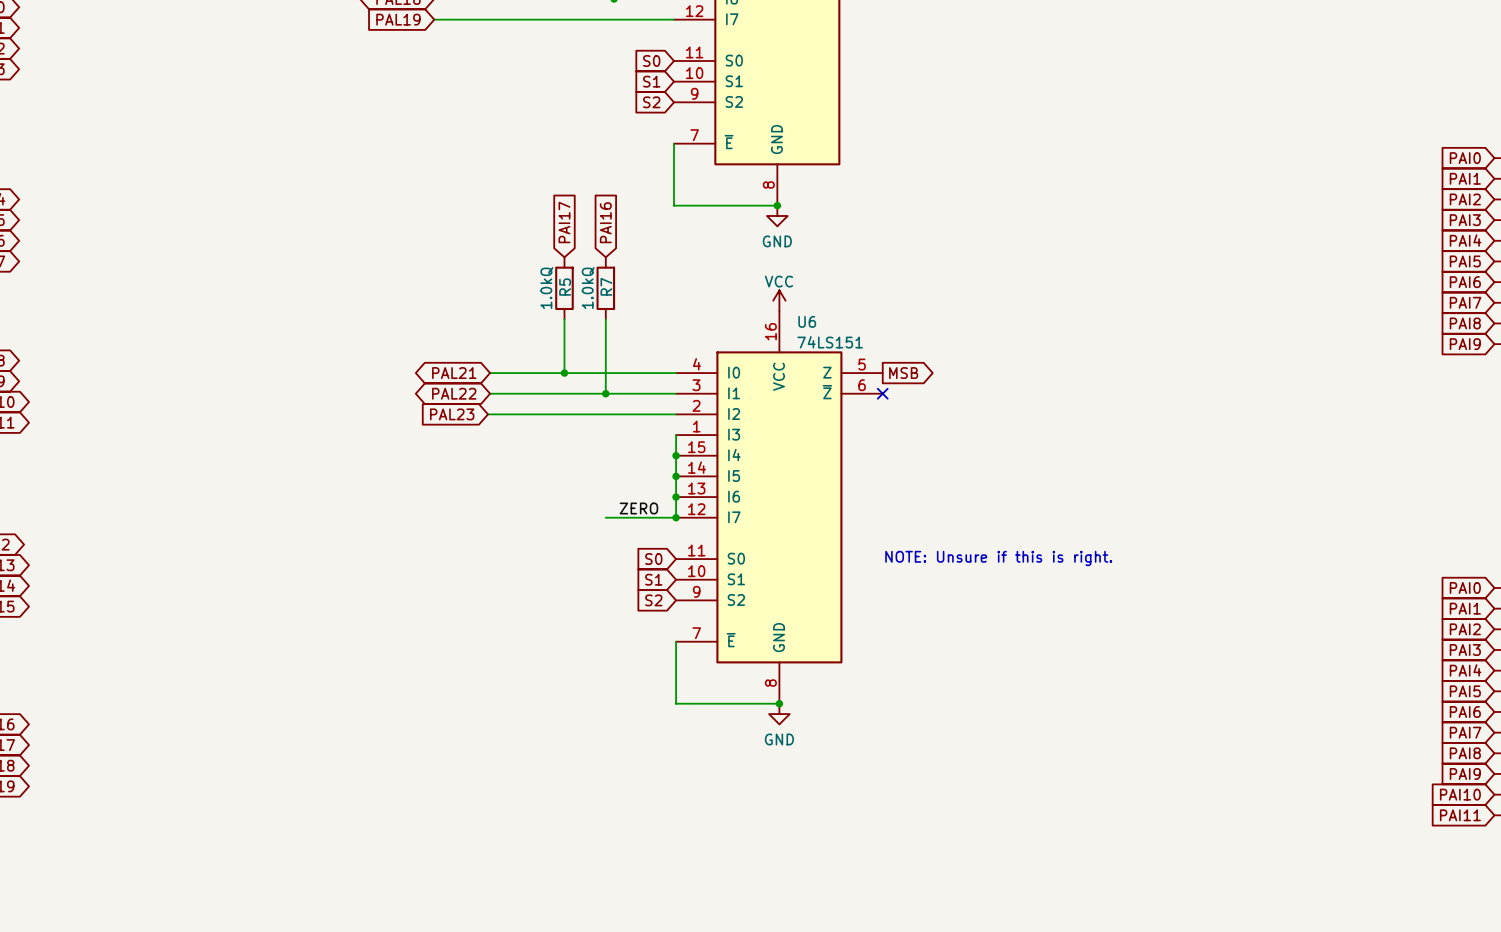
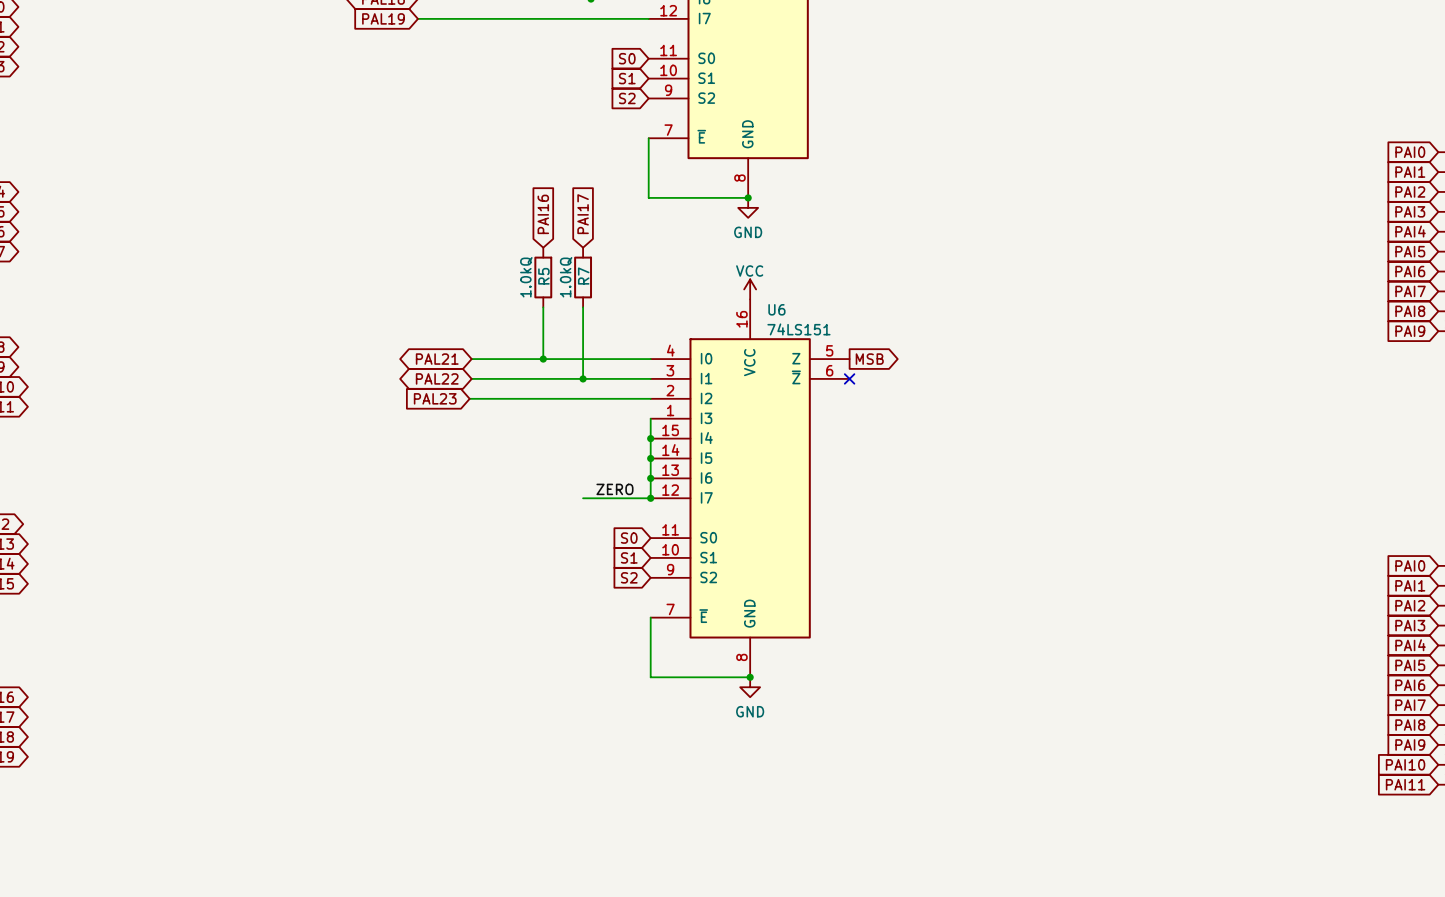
global label: PAI17 (564, 222) -> PAI16 (543, 214)
global label: PAI16 (605, 222) -> PAI17 (583, 214)
text: NOTE: Unsure if this is right. (998, 558) -> none

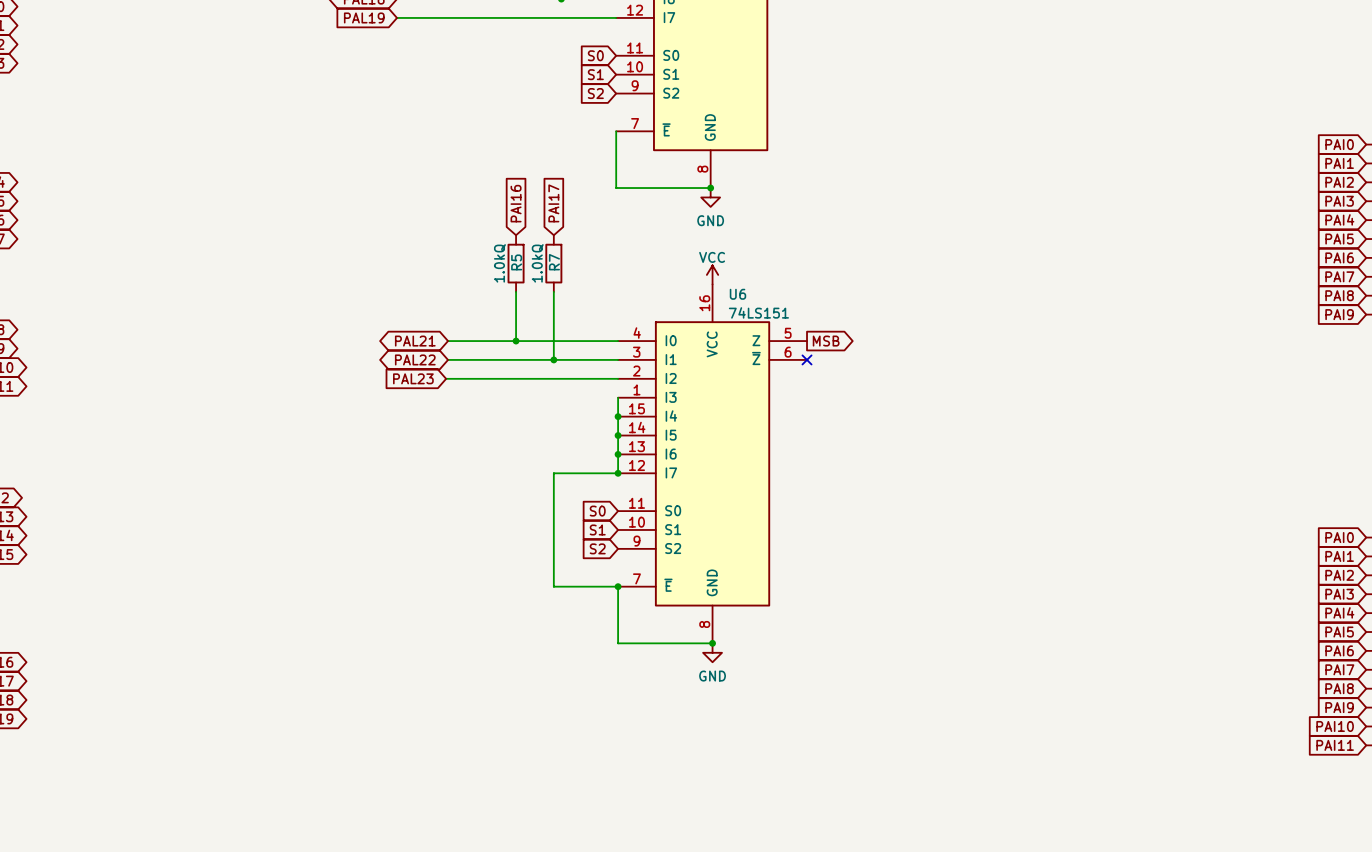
label: ZERO (614, 489) -> none
wire: none -> (553, 473) (553, 586) (618, 586)
junction: none -> (618, 586)

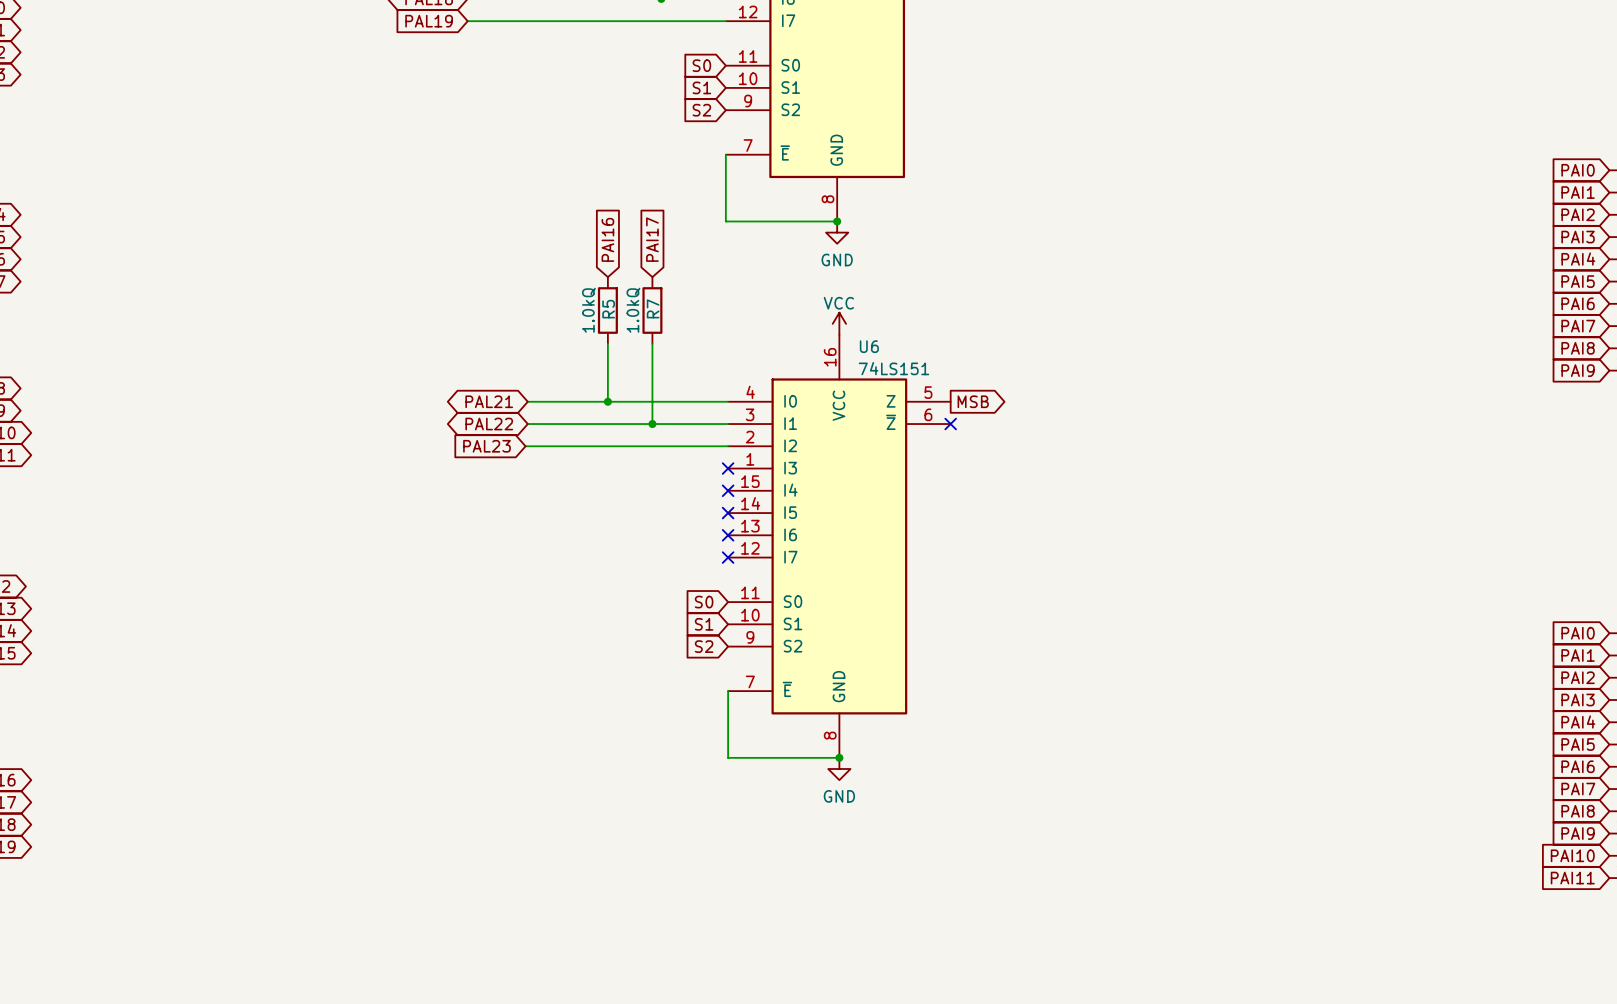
wire: (618, 397) (618, 473) (553, 473) (553, 586) (618, 586) -> none
no-connect mark: none -> (728, 468)
junction: (618, 416) -> none
no-connect mark: none -> (728, 490)
junction: (618, 435) -> none
no-connect mark: none -> (728, 513)
junction: (618, 454) -> none
no-connect mark: none -> (728, 535)
junction: (618, 473) -> none
no-connect mark: none -> (728, 557)
junction: (618, 586) -> none

